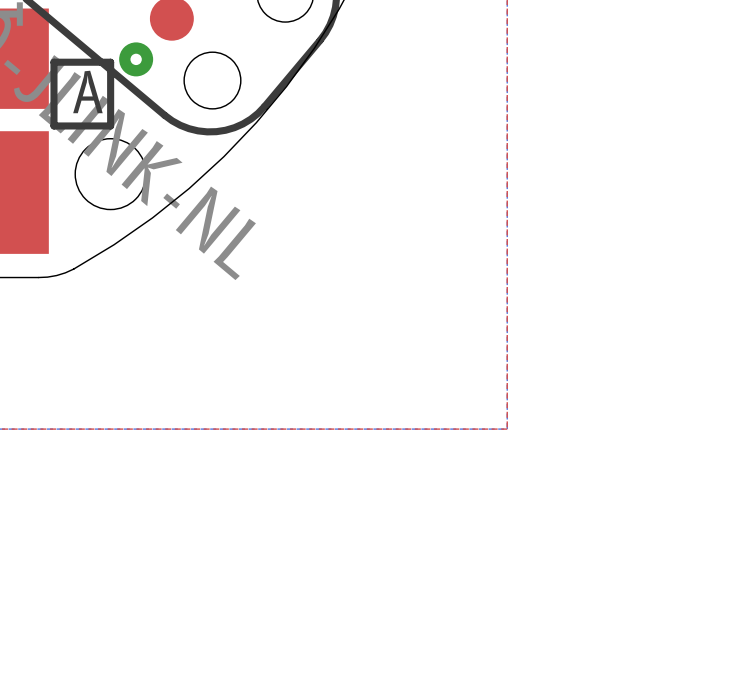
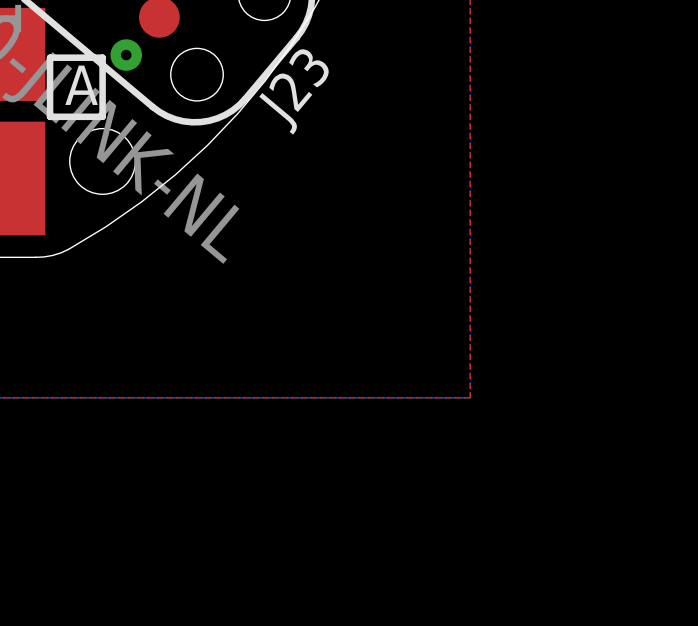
J23 name: none -> J23 (294, 91)

